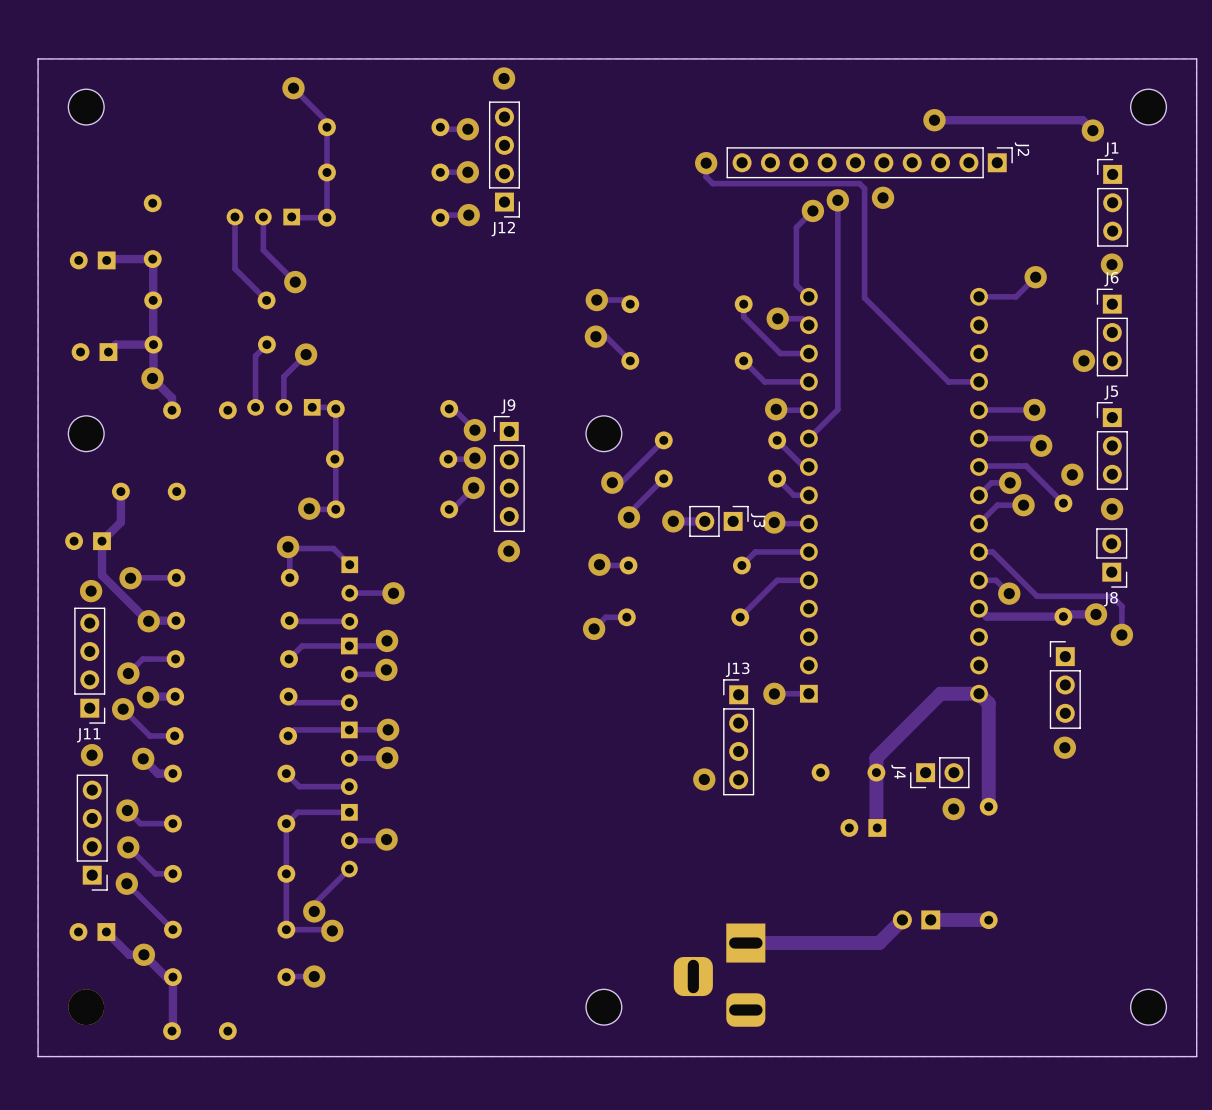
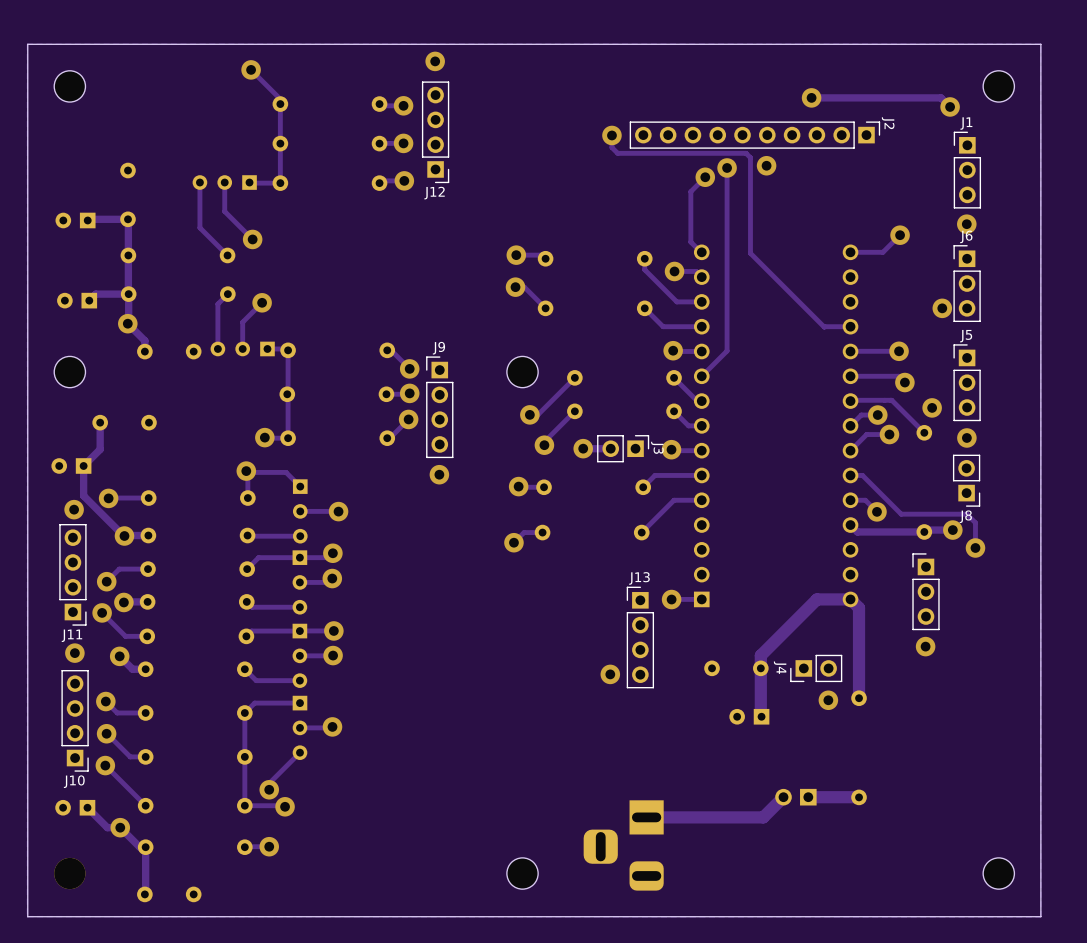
J10 name: none -> J10 (74, 781)

